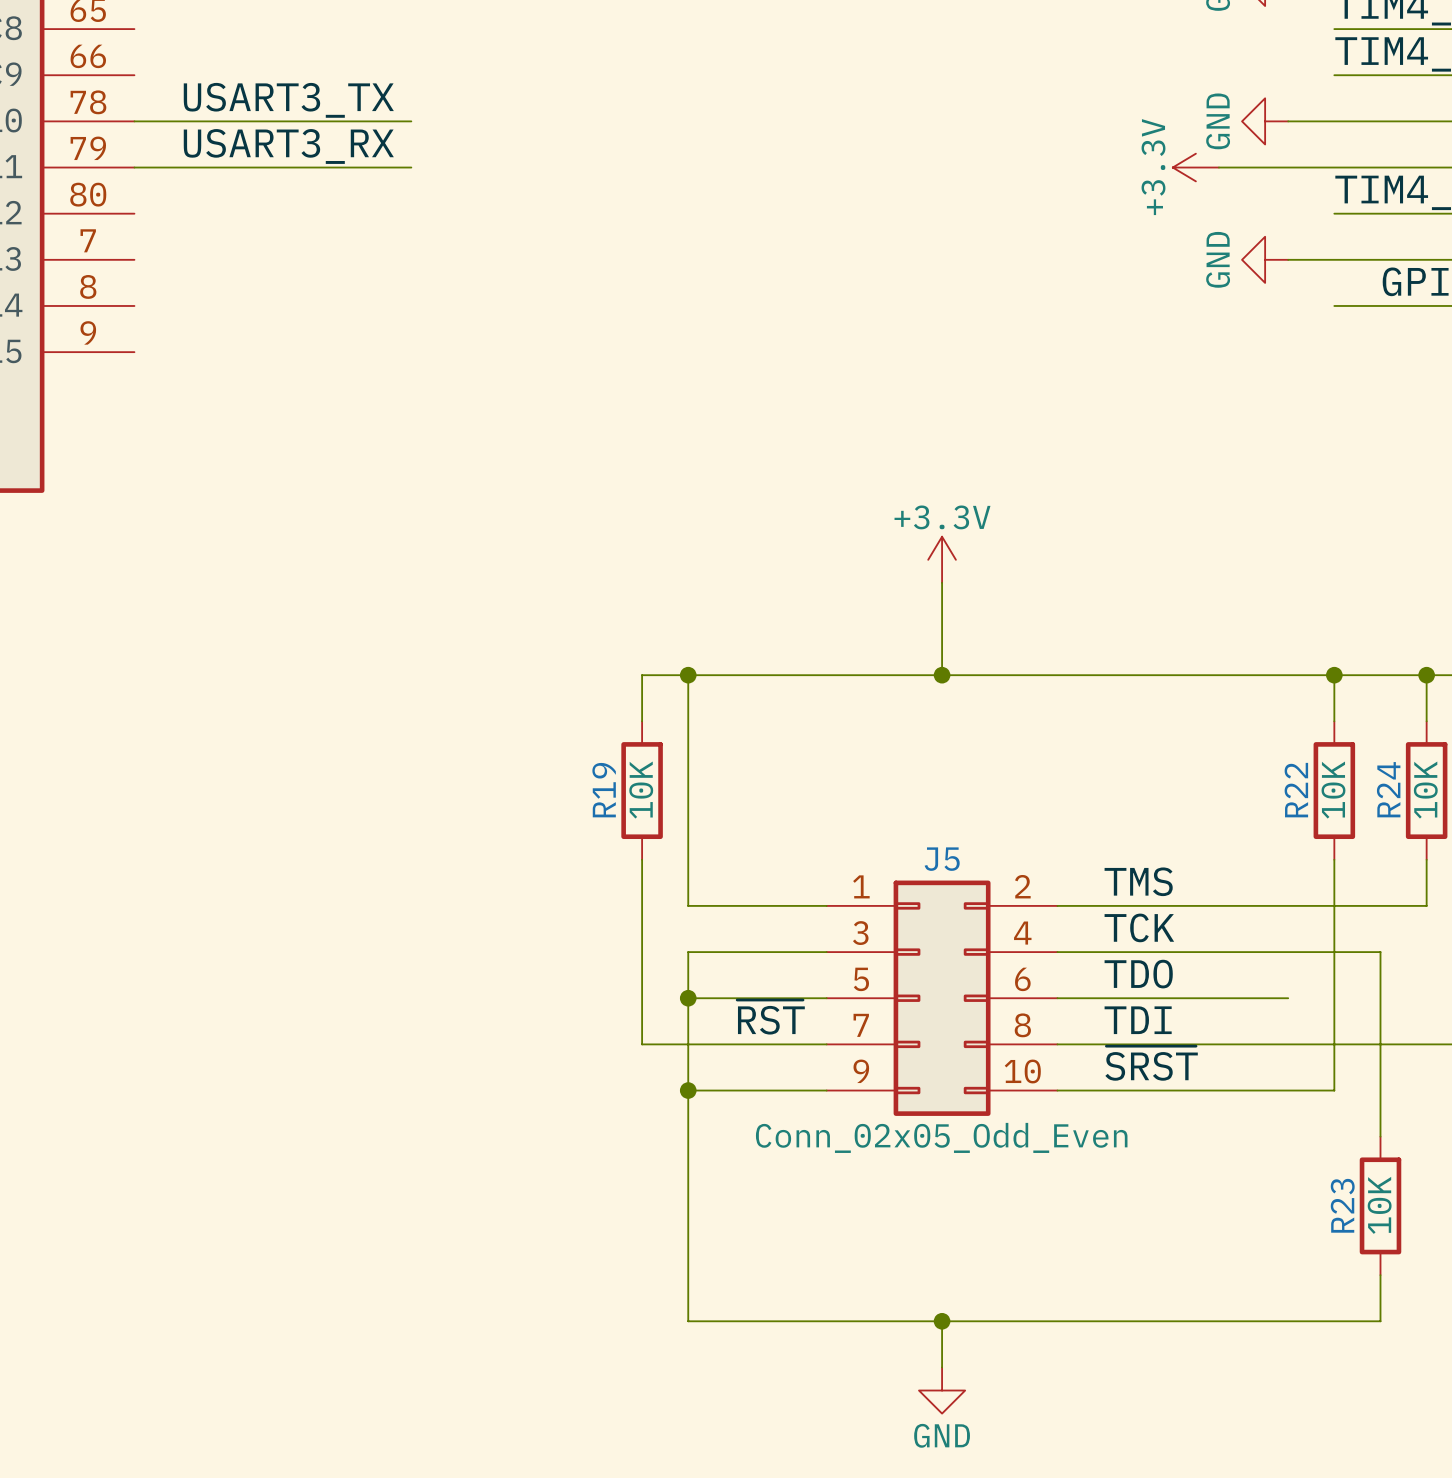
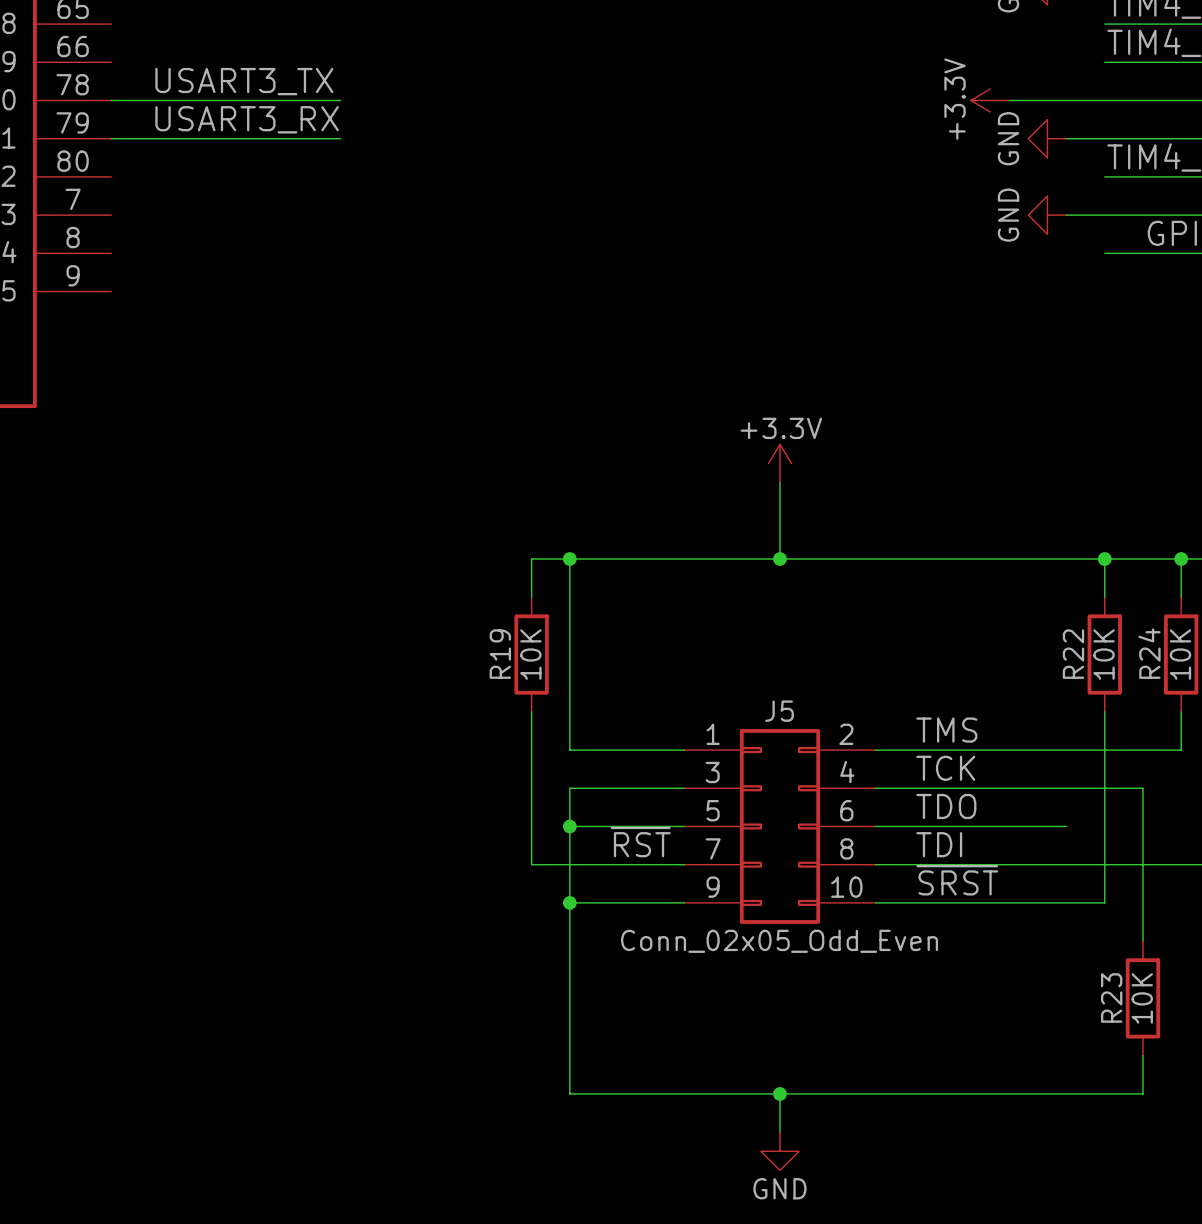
power symbol position: GND (1265, 121) -> GND (1047, 138)
power symbol position: +3.3V (1195, 167) -> +3.3V (990, 100)
wire: (1218, 167) (1288, 167) -> (1009, 100) (1066, 100)

